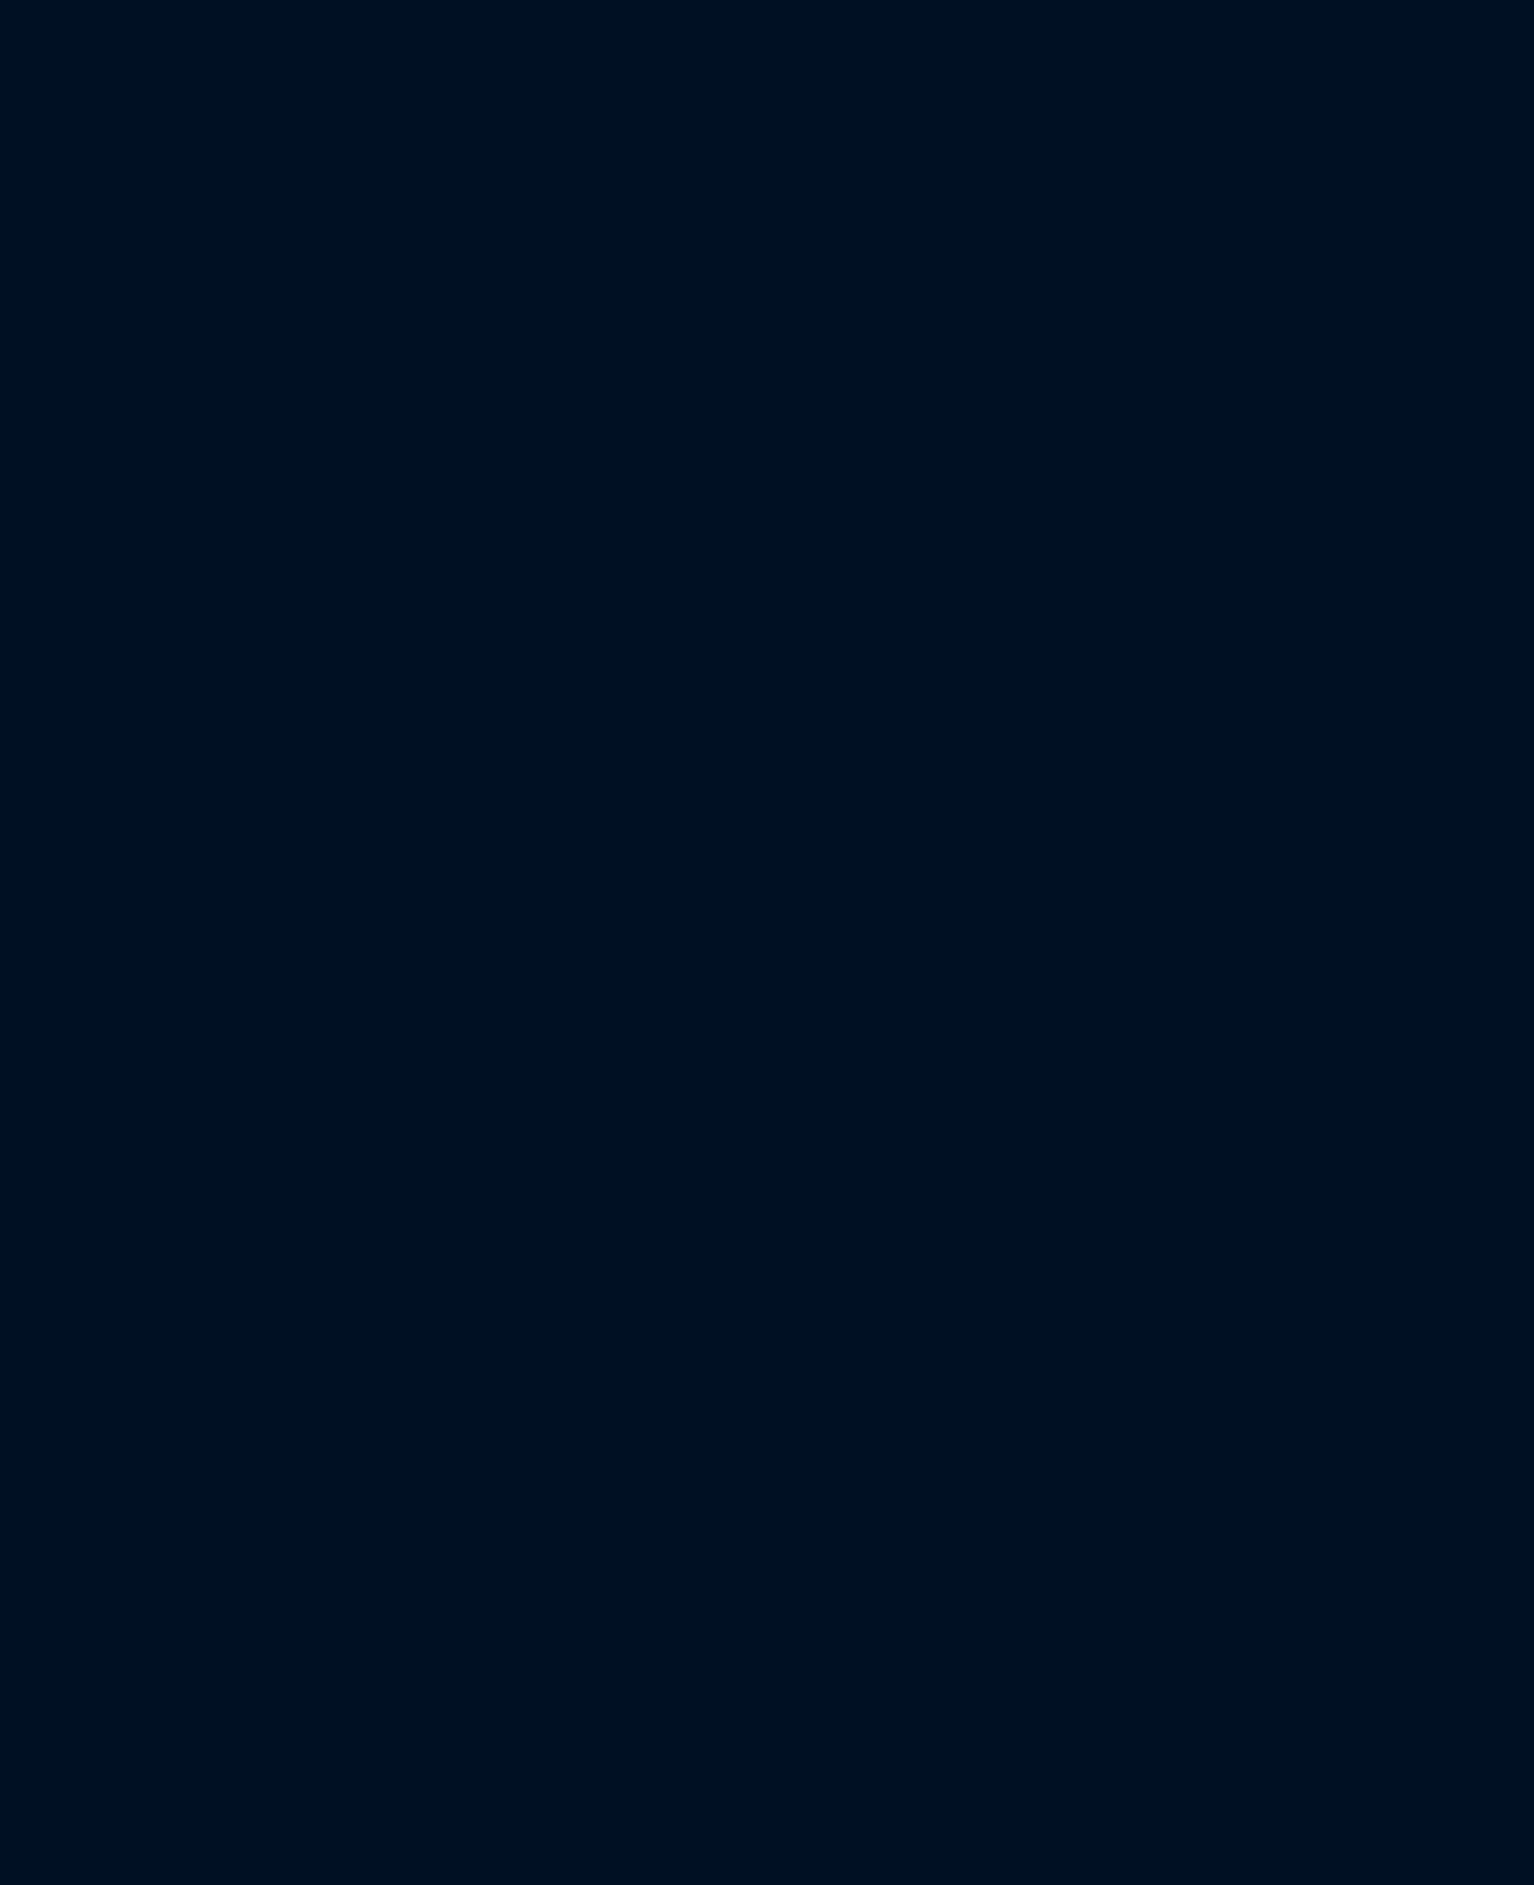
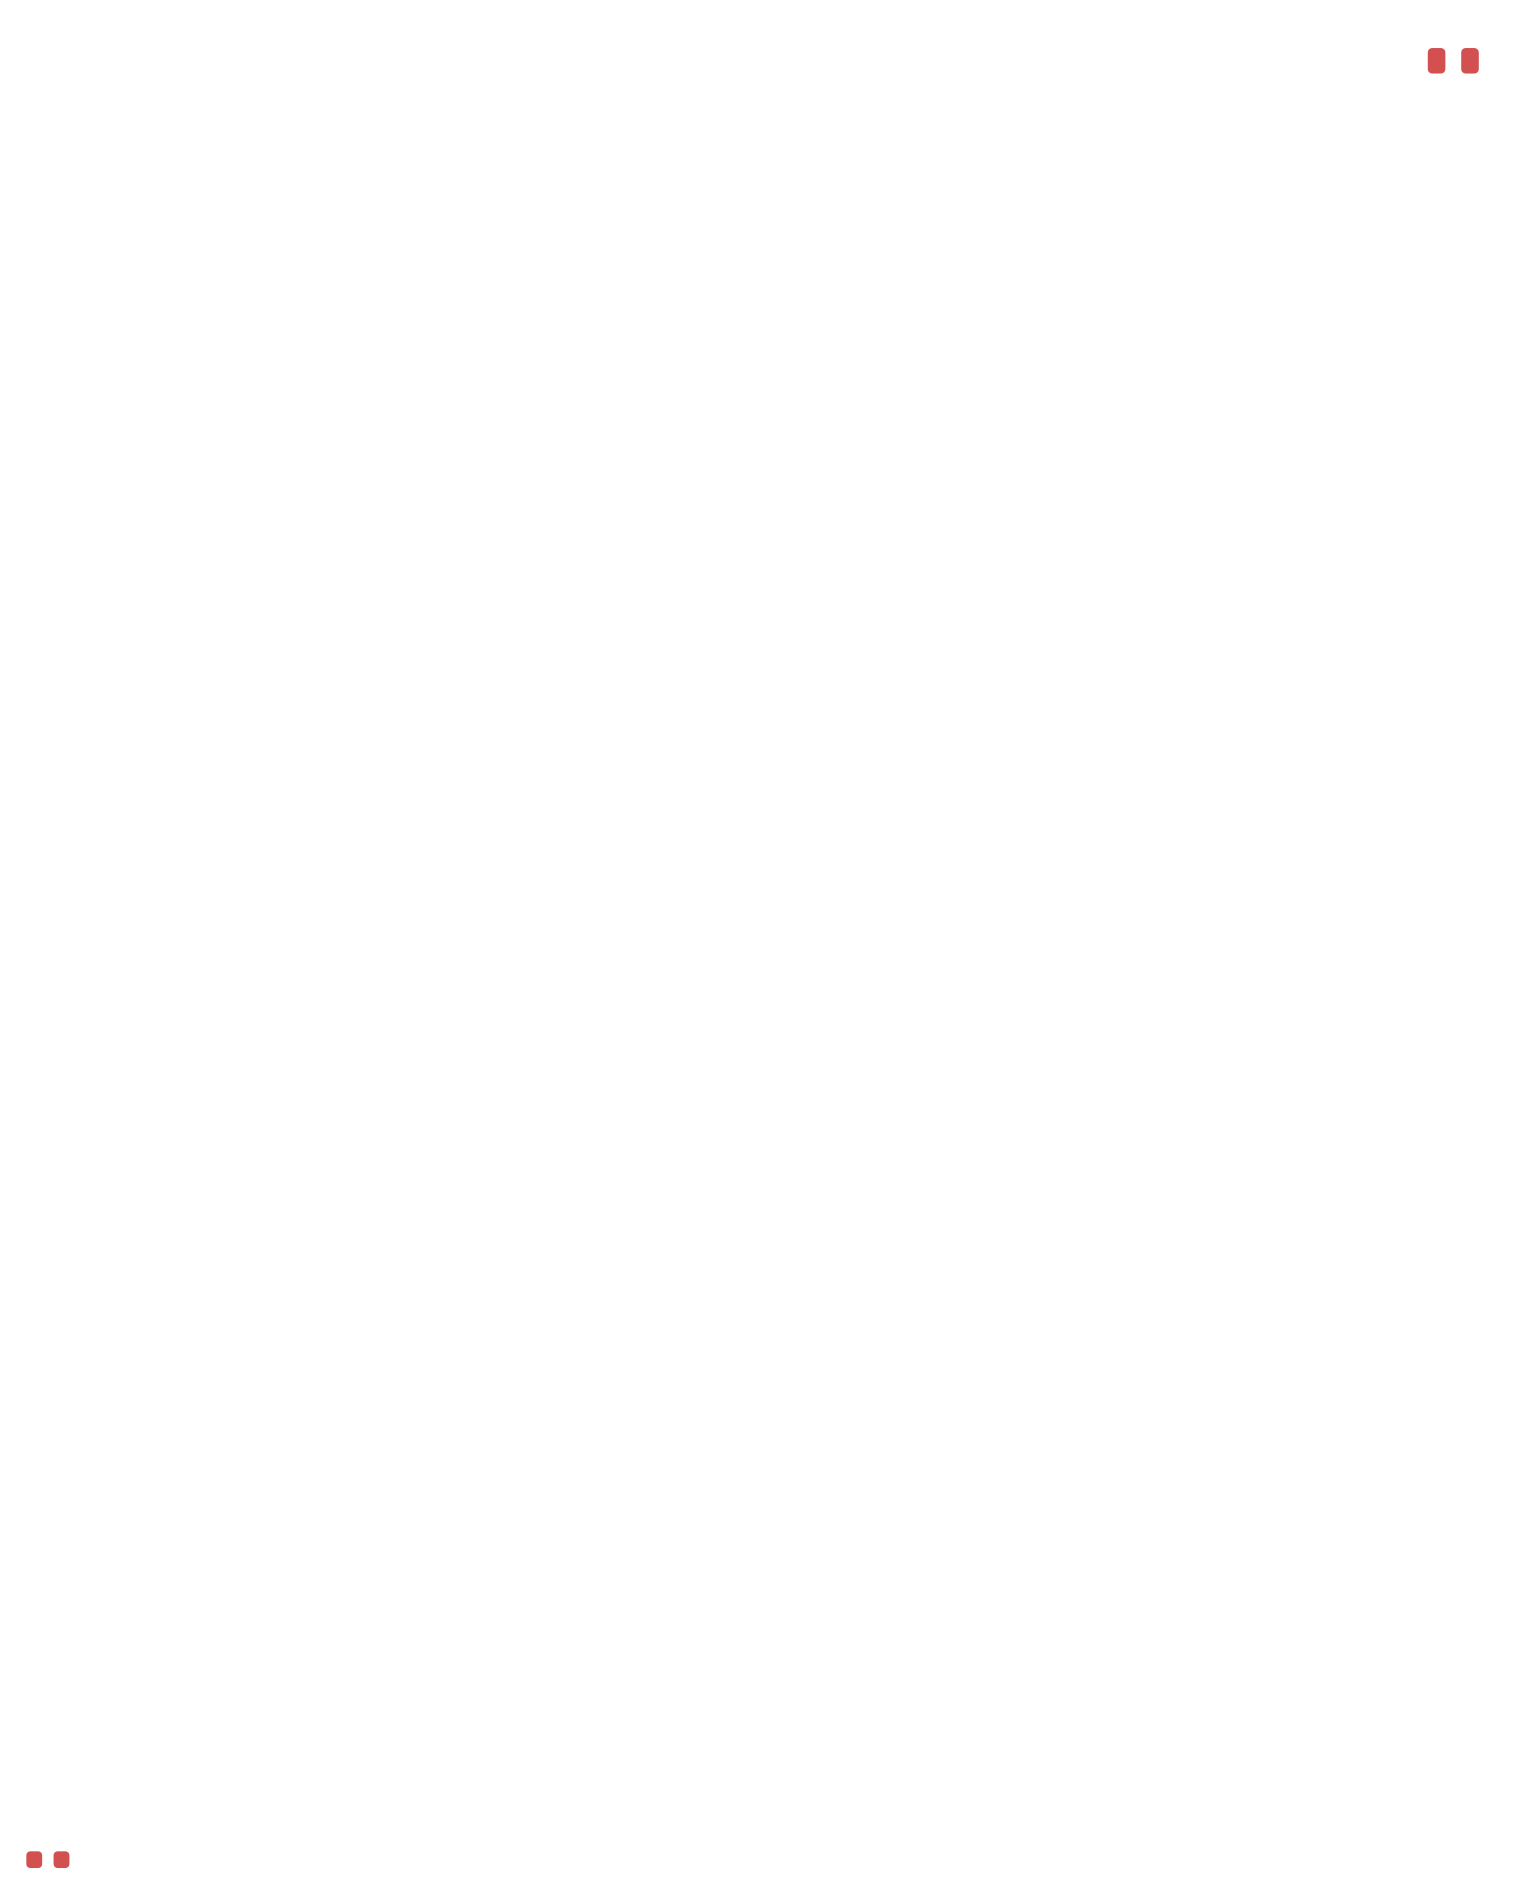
part: none -> (1453, 60)
part: none -> (47, 1859)

